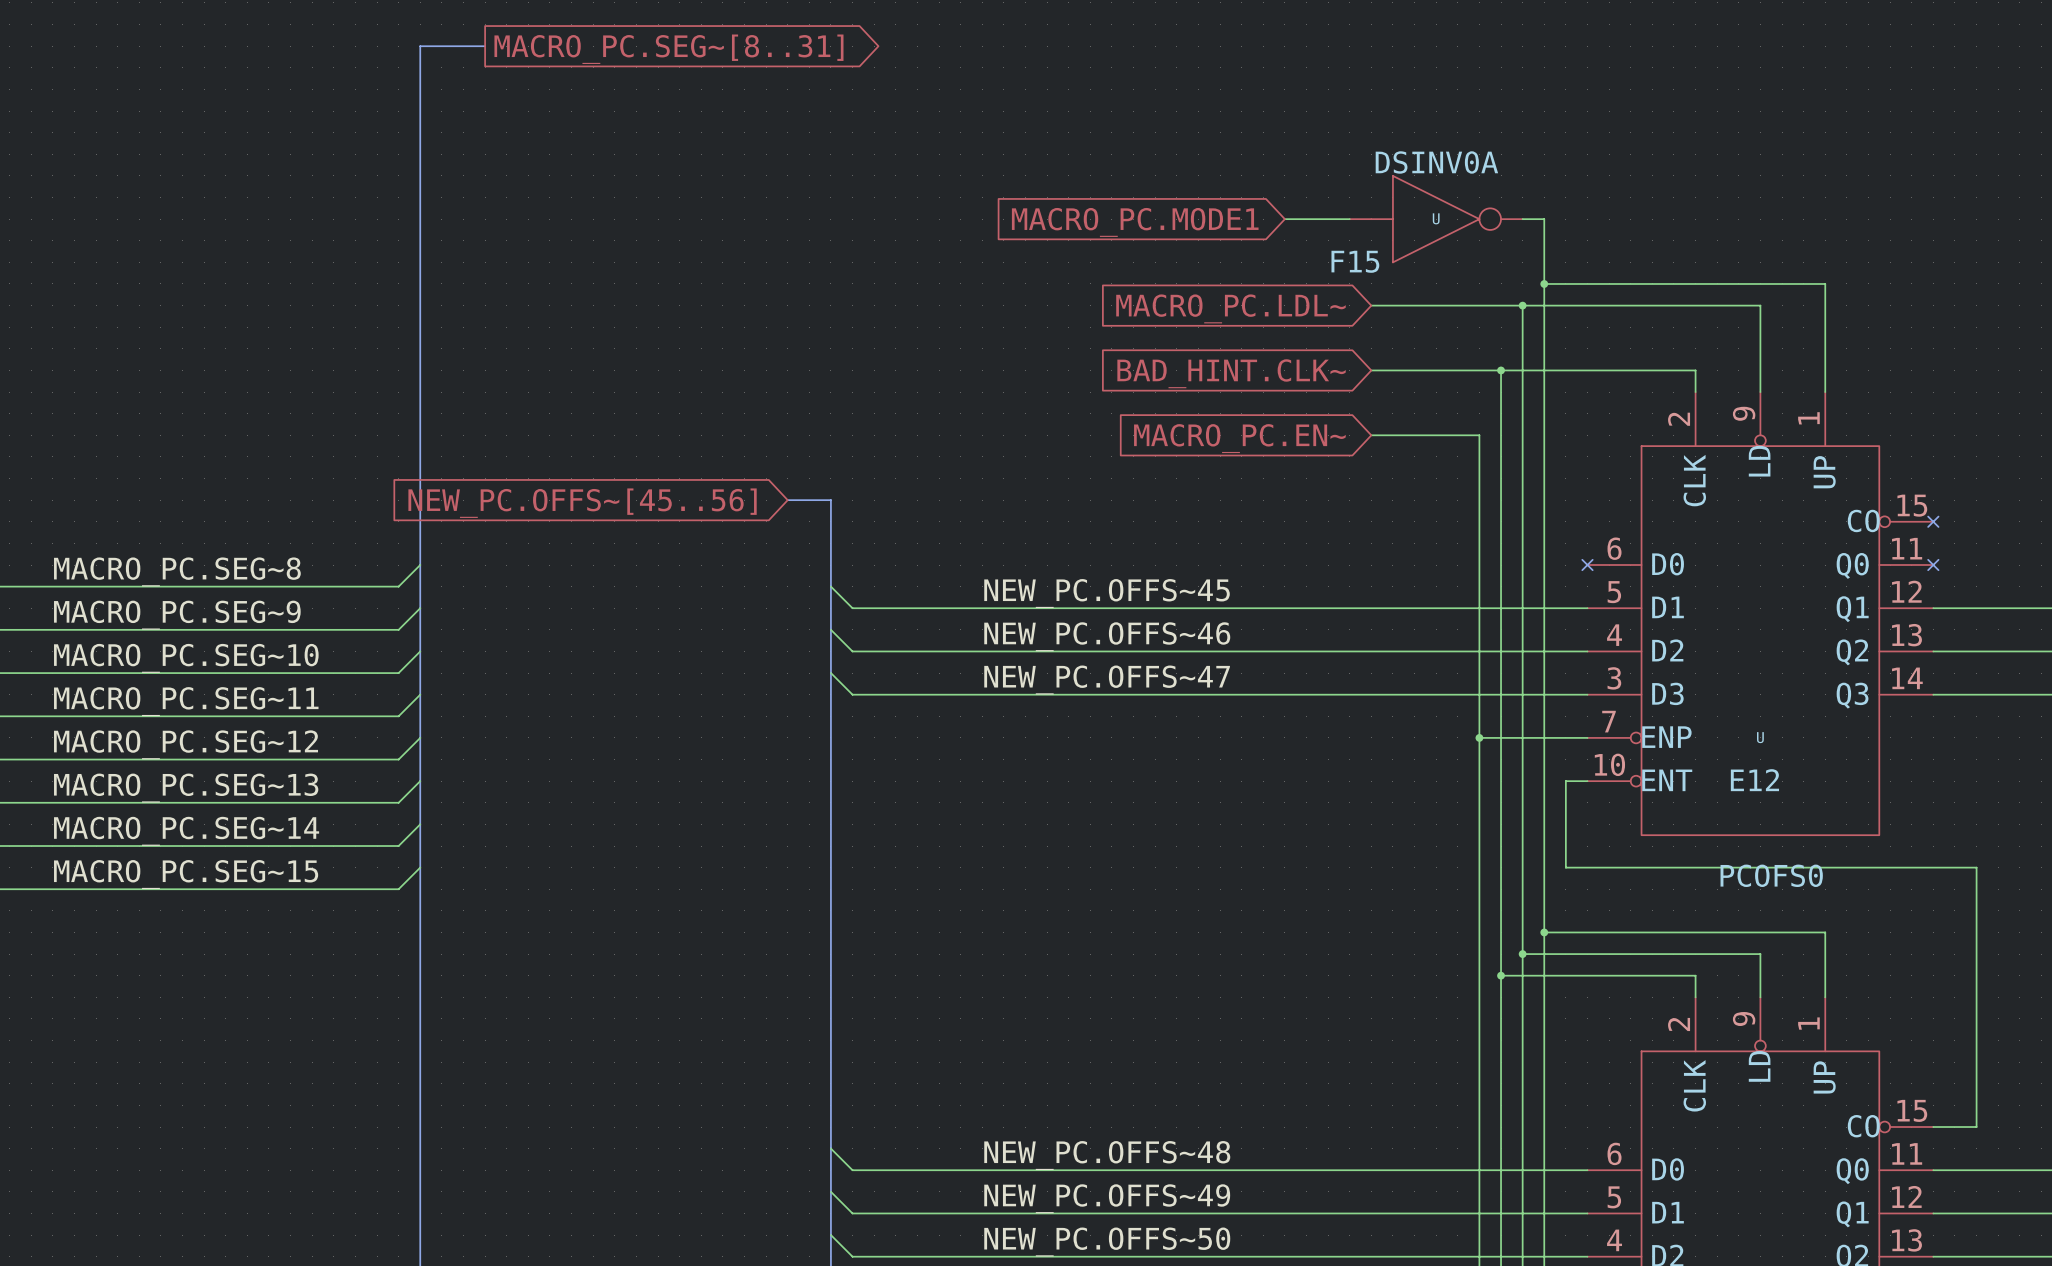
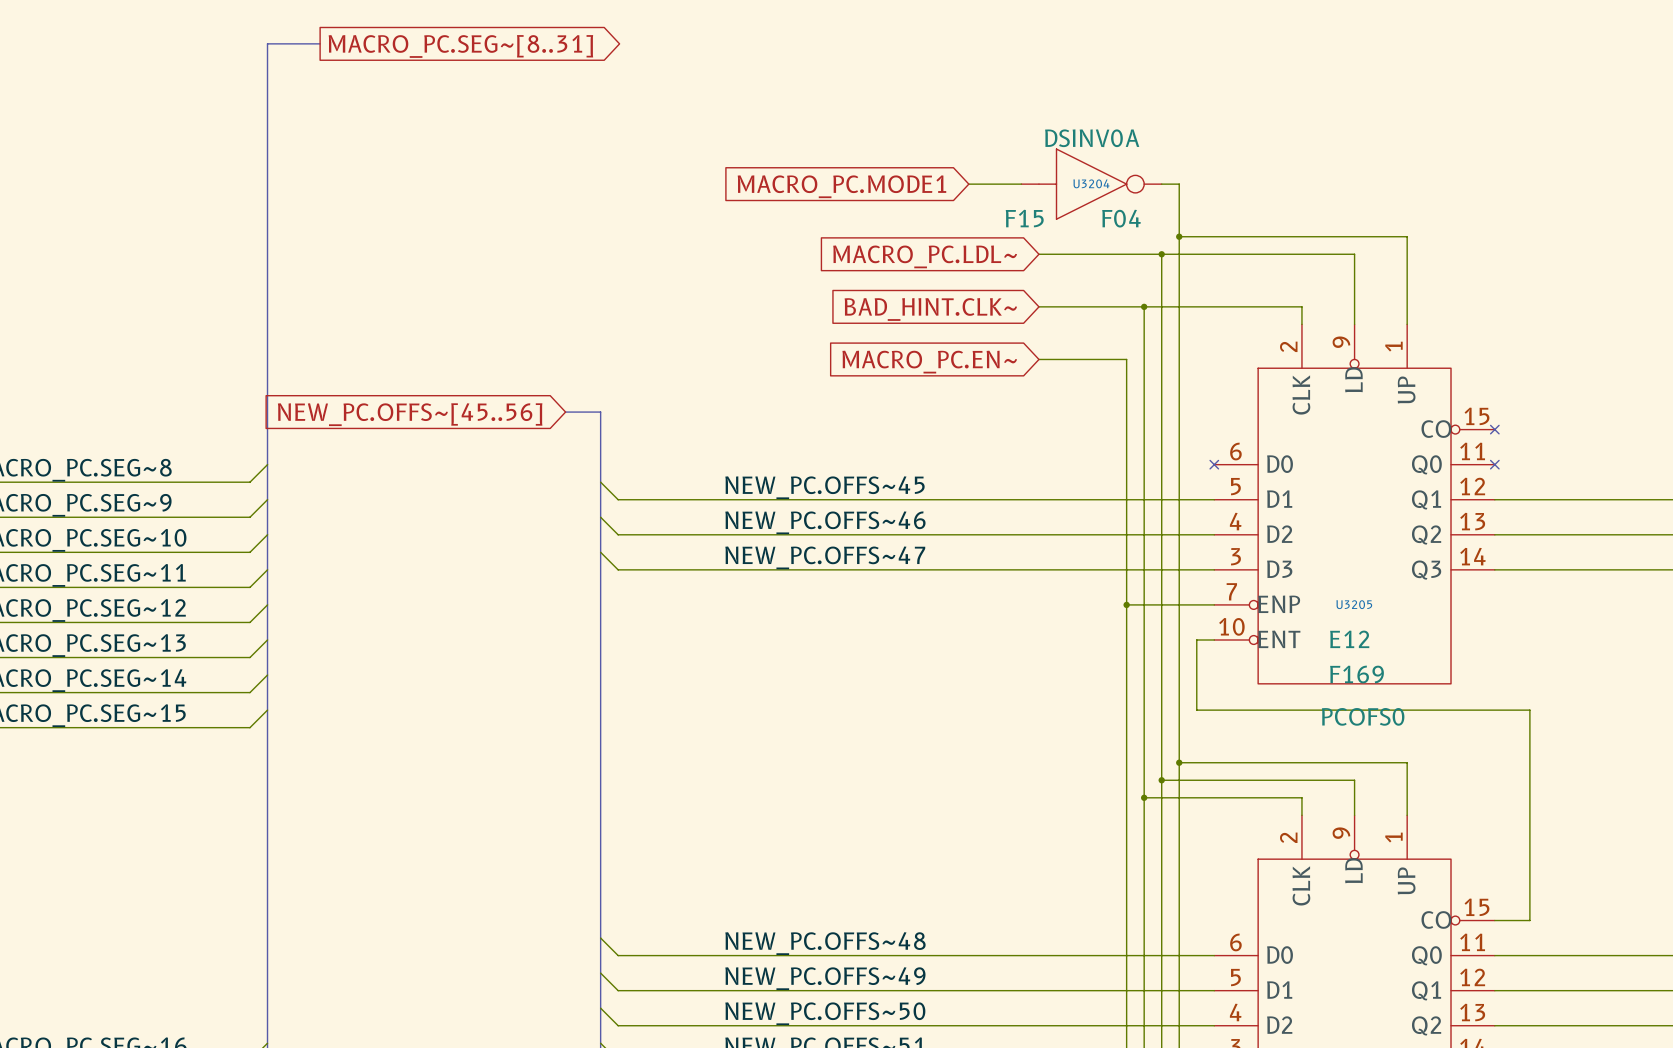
U name: U (1436, 218) -> U3204 (1091, 183)
U value: none -> F04 (1121, 218)
U name: U (1760, 737) -> U3205 (1354, 604)
U value: none -> F169 (1357, 674)

